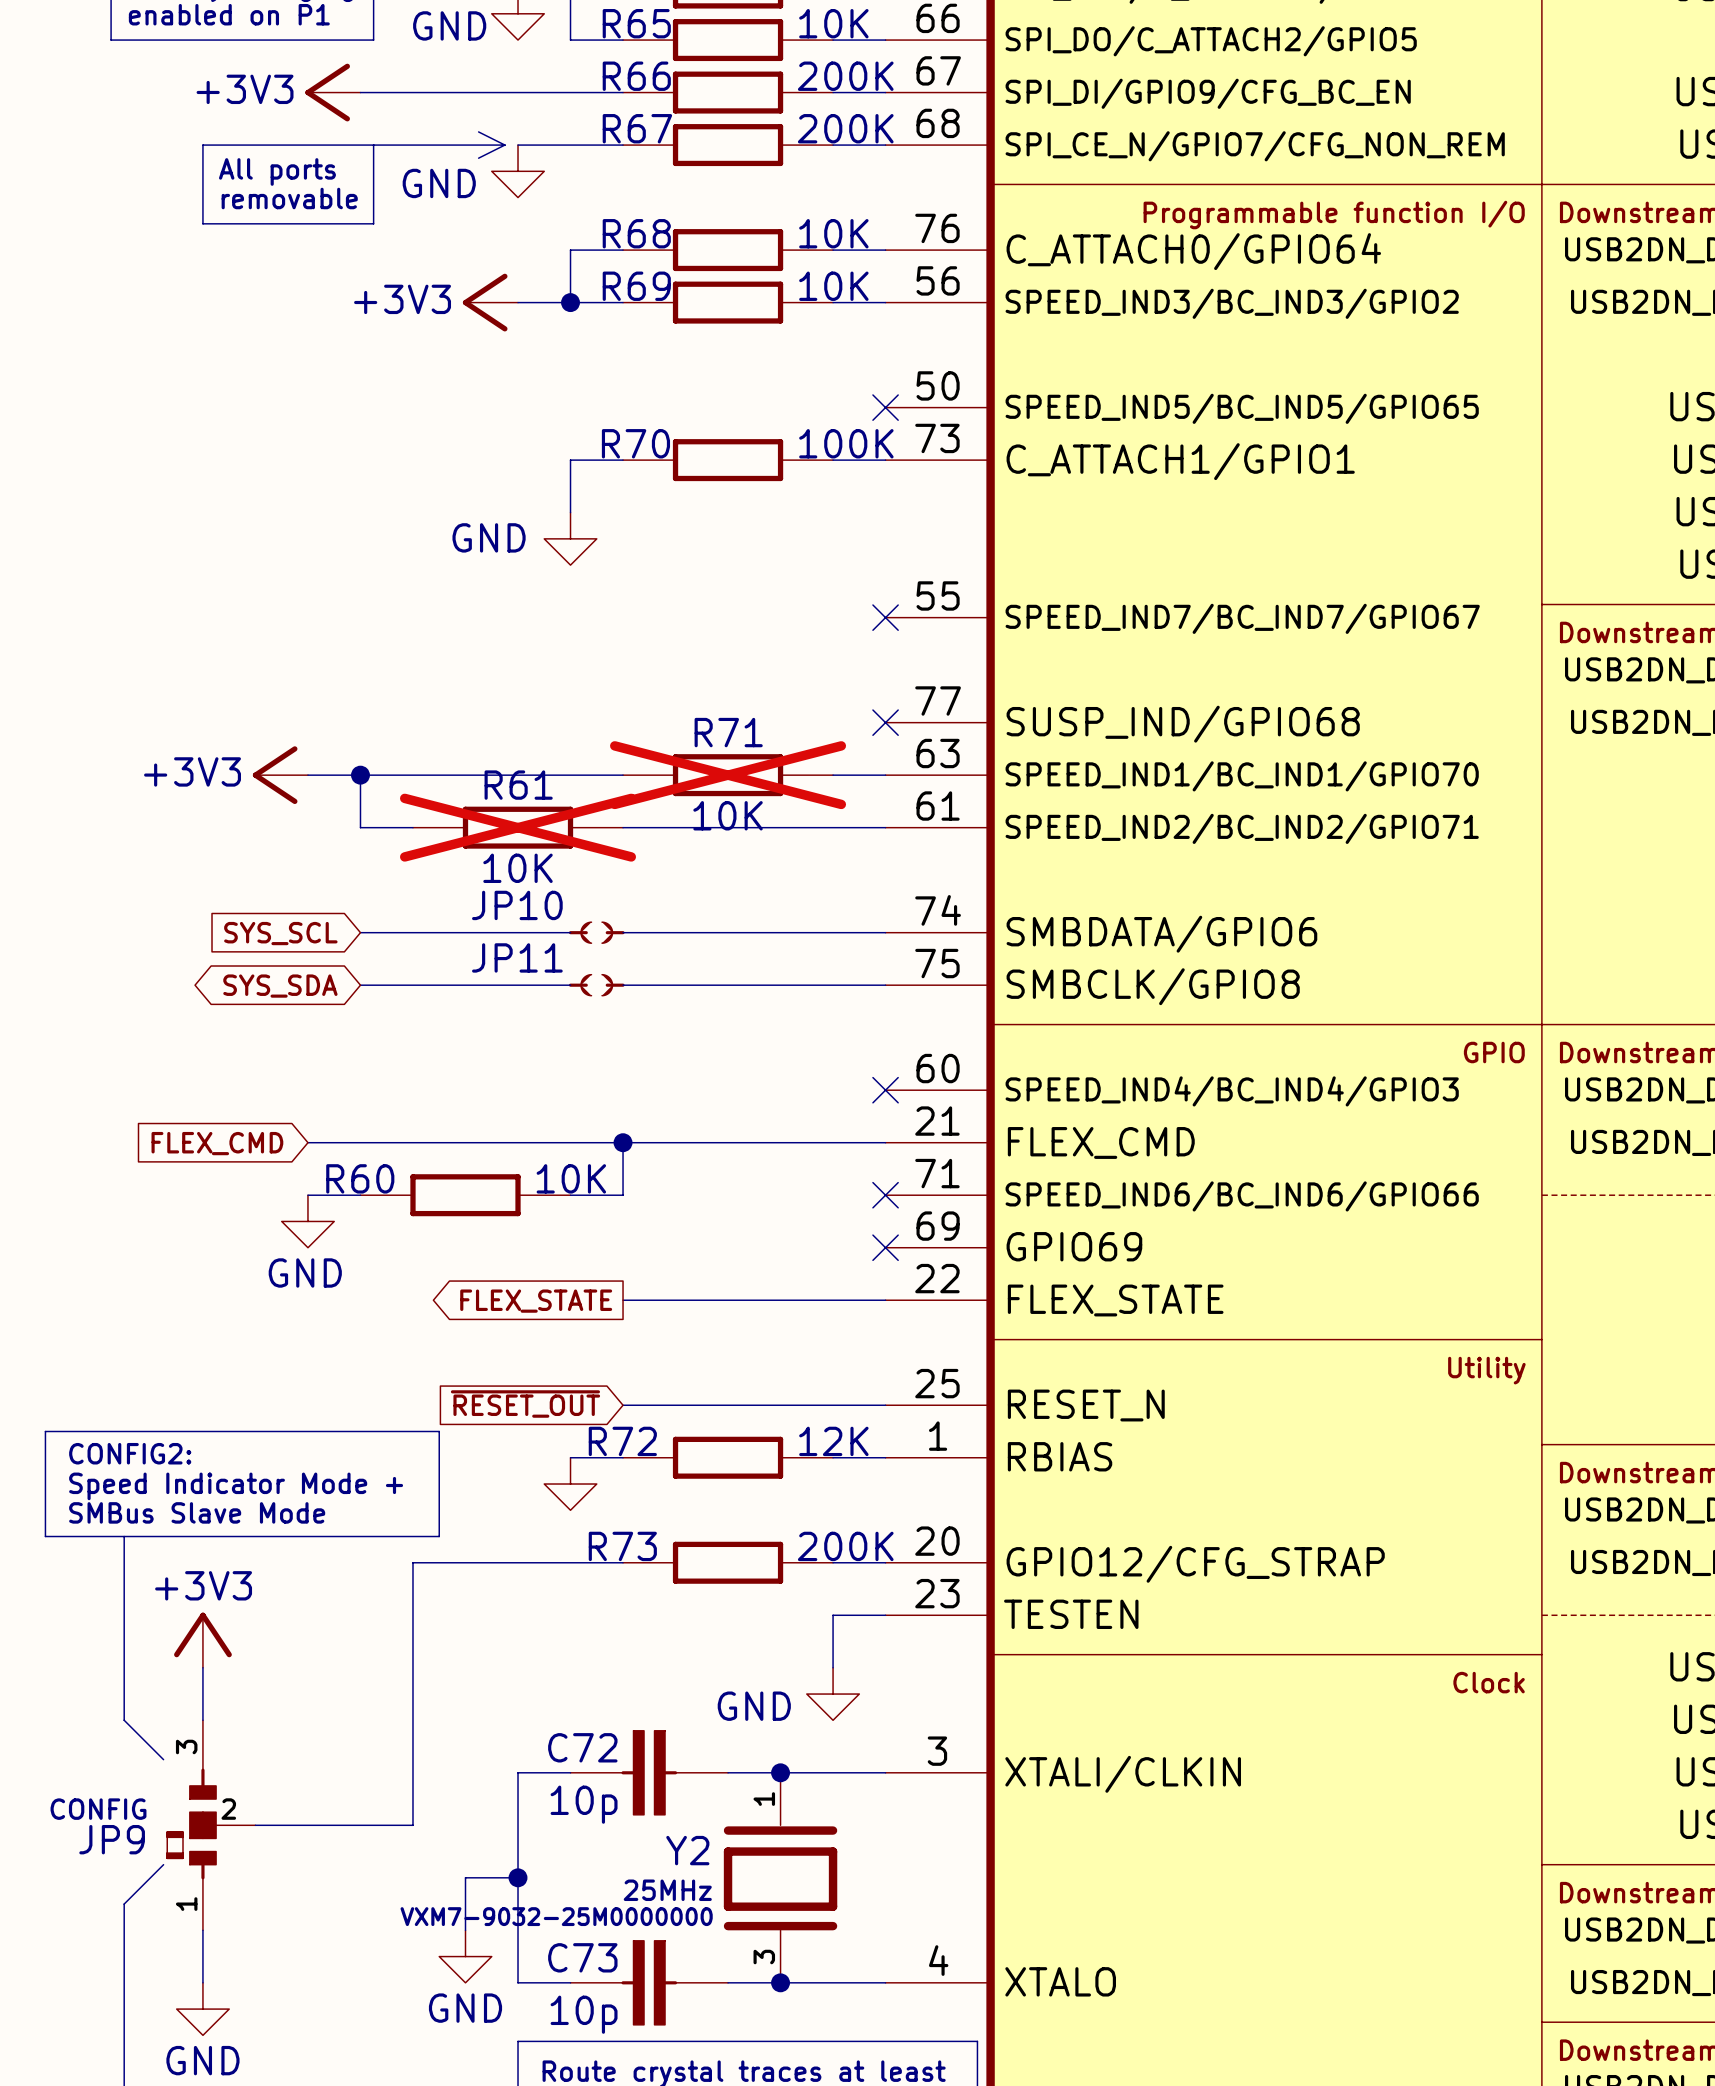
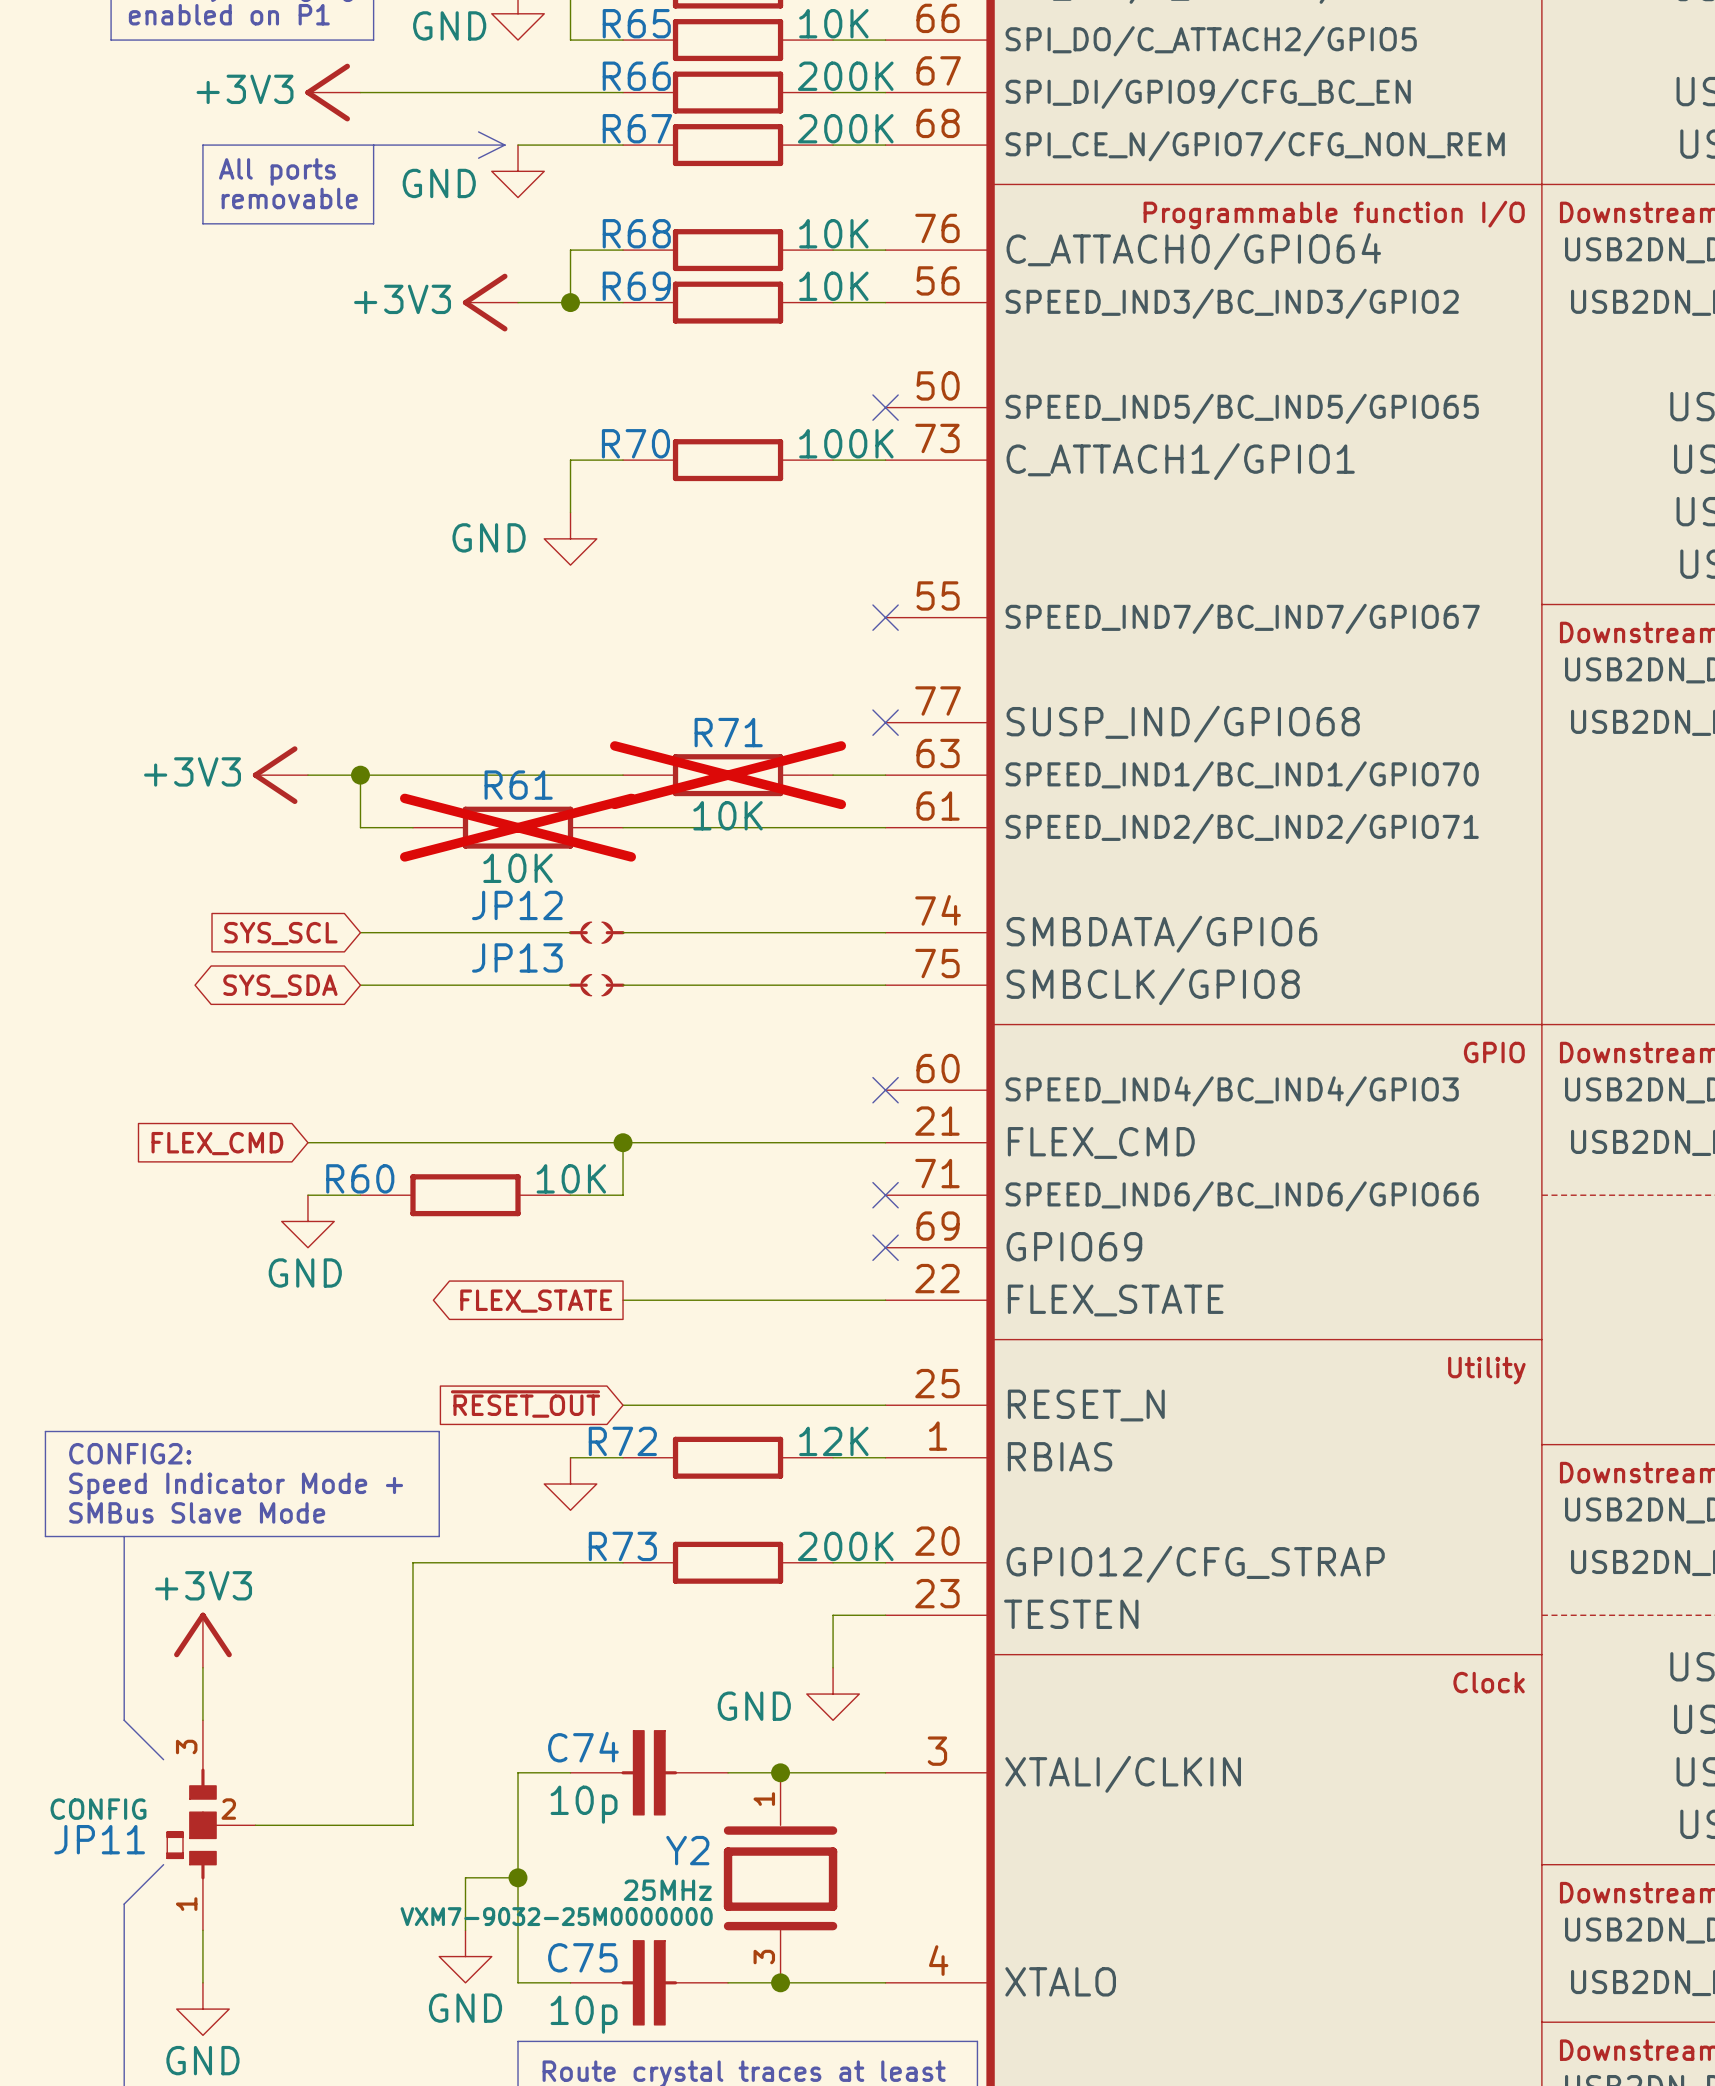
JP10 name: JP10 (517, 905) -> JP12 (517, 905)
JP11 name: JP11 (517, 957) -> JP13 (517, 957)
C72 name: C72 (582, 1747) -> C74 (583, 1747)
JP9 name: JP9 (112, 1839) -> JP11 (99, 1839)
C73 name: C73 (582, 1957) -> C75 (582, 1957)

